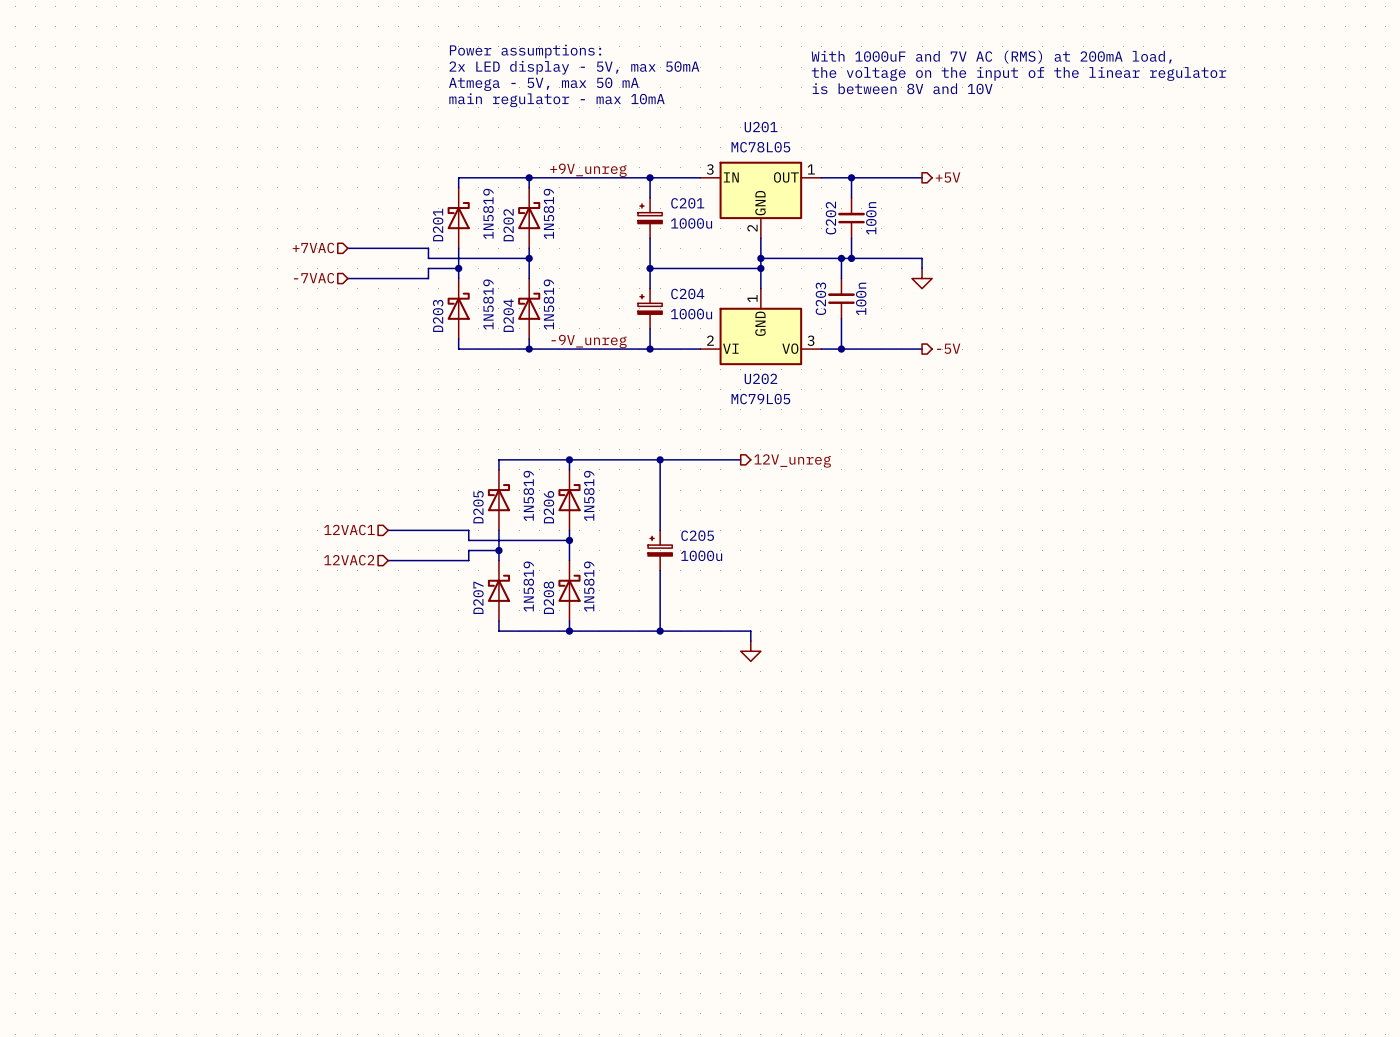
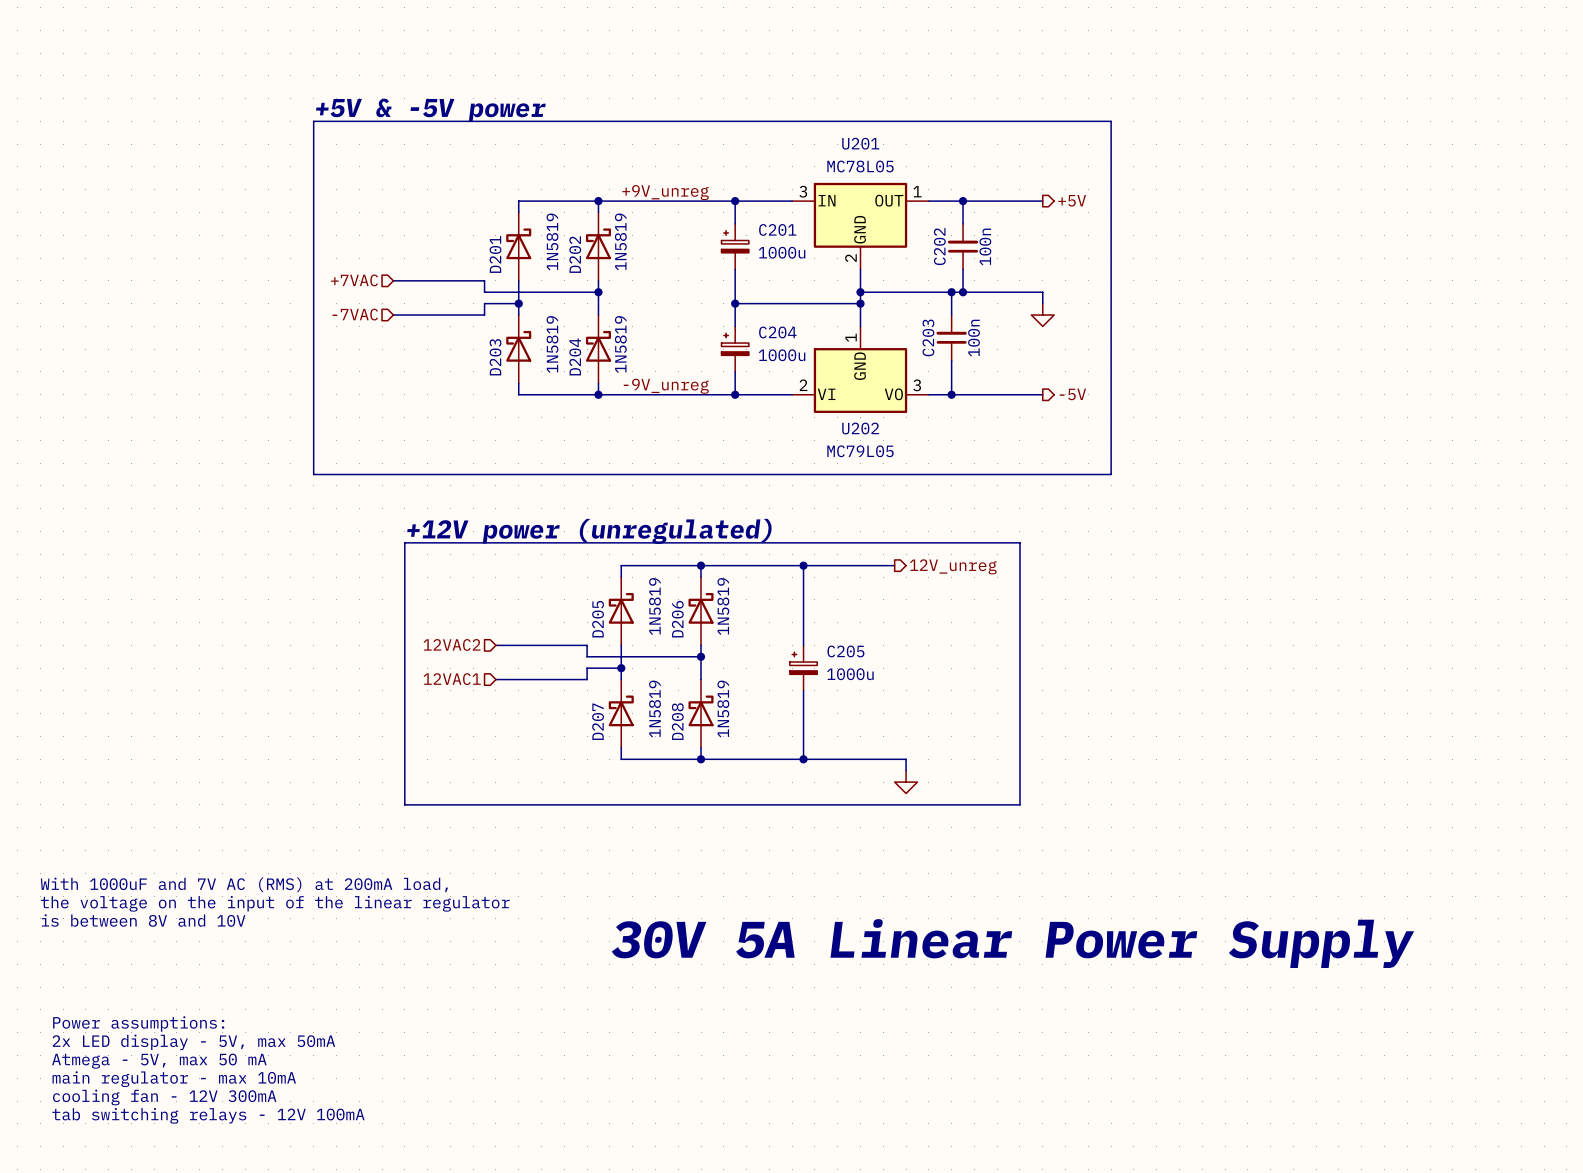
text: Power assumptions: (525, 51) -> none
text: With 1000uF and 7V AC (RMS) at 200mA load, (991, 57) -> none
text: 2x LED display - 5V, max 50mA (574, 67) -> none
text: the voltage on the input of the linear regulator (1019, 73) -> none
text: Atmega - 5V, max 50 mA (543, 84) -> none
text: is between 8V and 10V (902, 88) -> none
text: none -> +5V & -5V power (430, 110)
text: main regulator - max 10mA (557, 100) -> none
line: none -> (313, 121) (313, 474) (1111, 474) (1111, 121) (313, 121)
wire: (569, 459) (569, 469) -> (701, 565) (701, 577)
junction: (569, 459) -> none
wire: (660, 459) (660, 530) -> (803, 565) (803, 645)
junction: (660, 459) -> none
wire: (740, 459) (498, 459) (498, 469) -> (894, 565) (621, 565) (621, 577)
hierarchical label position: 12V_unreg (792, 460) -> 12V_unreg (953, 566)
text: none -> +12V power (unregulated) (589, 531)
line: none -> (404, 542) (404, 804) (1019, 804) (1019, 542) (404, 542)
D205 position: (498, 500) -> (621, 611)
D206 position: (569, 500) -> (701, 611)
junction: none -> (701, 565)
junction: none -> (803, 565)
hierarchical label position: 12VAC1 (349, 530) -> 12VAC1 (452, 679)
wire: (388, 530) (468, 530) (468, 540) (569, 540) -> (495, 645) (587, 645) (587, 656) (701, 656)
wire: (498, 530) (498, 560) -> (621, 645) (621, 679)
wire: (569, 530) (569, 560) -> (701, 645) (701, 679)
junction: (569, 540) -> none
wire: (498, 550) (468, 550) (468, 560) (388, 560) -> (621, 668) (587, 668) (587, 679) (495, 679)
junction: (498, 550) -> none
C205 position: (660, 550) -> (803, 668)
hierarchical label position: 12VAC2 (349, 560) -> 12VAC2 (452, 644)
wire: (660, 570) (660, 631) -> (803, 690) (803, 759)
junction: none -> (701, 656)
D207 position: (498, 590) -> (621, 713)
junction: none -> (621, 668)
D208 position: (569, 590) -> (701, 713)
wire: (498, 621) (498, 631) (750, 631) (750, 641) -> (621, 747) (621, 759) (906, 759) (906, 770)
wire: (569, 621) (569, 631) -> (701, 747) (701, 759)
junction: (569, 631) -> none
junction: (660, 631) -> none
power symbol position: (750, 651) -> (906, 782)
junction: none -> (701, 759)
junction: none -> (803, 759)
text: none -> With 1000uF and 7V AC (RMS) at 200mA load, (244, 884)
text: none -> the voltage on the input of the linear regulator (275, 903)
text: none -> is between 8V and 10V (143, 920)
text: none -> 30V 5A Linear Power Supply (1013, 943)
text: none -> Power assumptions: (138, 1024)
text: none -> 2x LED display - 5V, max 50mA (193, 1042)
text: none -> Atmega - 5V, max 50 mA (159, 1061)
text: none -> main regulator - max 10mA (174, 1079)
text: none -> cooling fan - 12V 300mA (164, 1097)
text: none -> tab switching relays - 12V 100mA (208, 1115)

